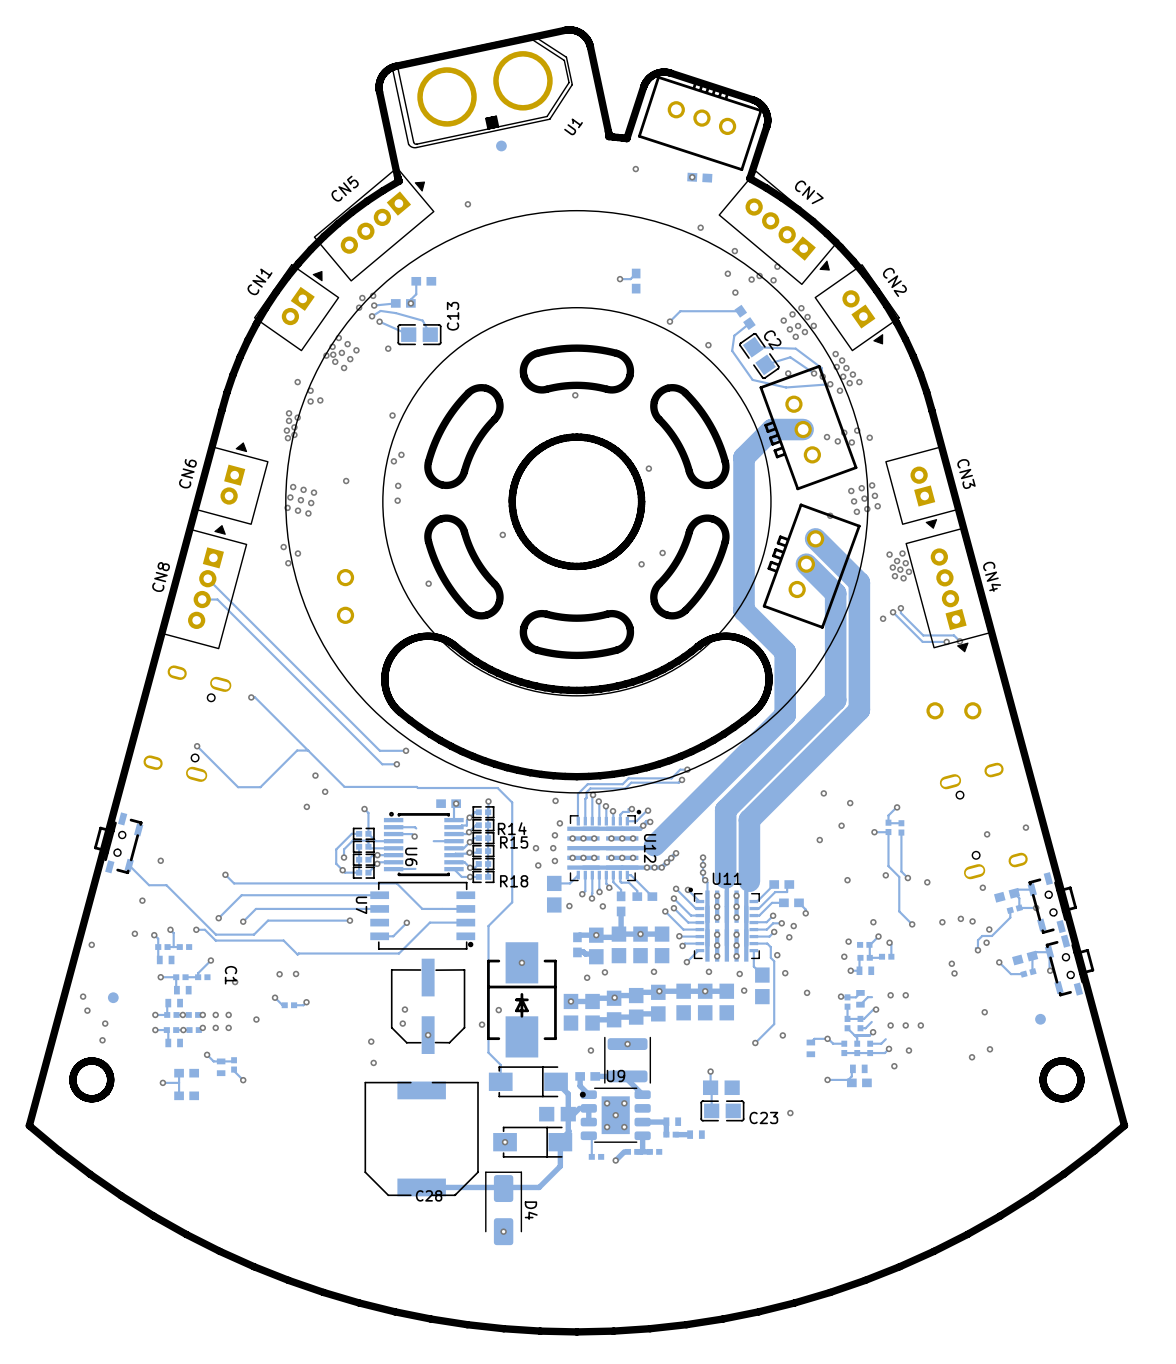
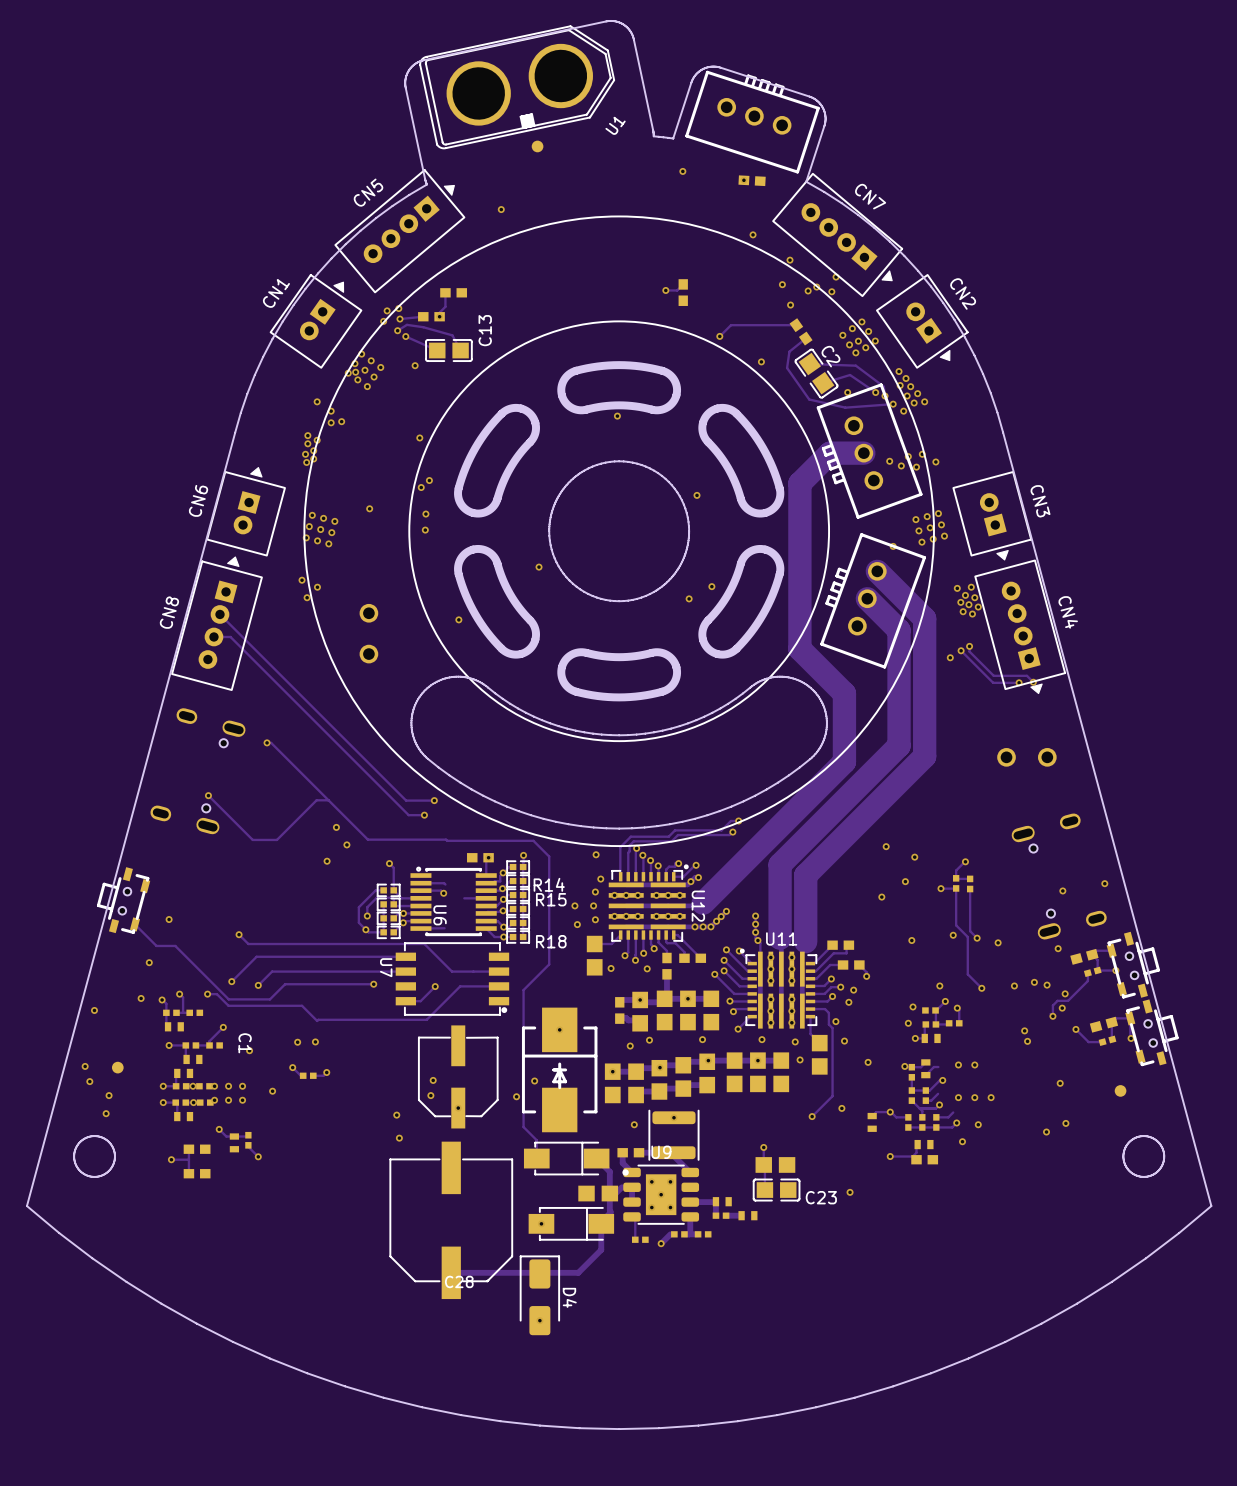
board edge width: thick (626, 138) (646, 81) (657, 73) (670, 73) (753, 100) (763, 107) (767, 115) (767, 123) (750, 178) -> thin (673, 138) (694, 76) (706, 67) (720, 67) (810, 96) (820, 104) (824, 113) (825, 122) (806, 181)
board edge width: thick (626, 138) (608, 136) (589, 44) (583, 35) (574, 30) (564, 30) (395, 66) (387, 70) (381, 76) (379, 90) (399, 181) (352, 212) (324, 236) (298, 263) (275, 292) (256, 323) (233, 374) (29, 1125) (89, 1174) (153, 1215) (219, 1251) (253, 1266) (323, 1292) (359, 1302) (430, 1319) (467, 1324) (540, 1331) (613, 1331) (650, 1328) (722, 1319) (758, 1311) (830, 1292) (865, 1280) (933, 1251) (967, 1234) (1032, 1195) (1064, 1174) (1124, 1125) (920, 374) (896, 322) (876, 290) (853, 260) (827, 233) (798, 209) (749, 178) -> thin (673, 138) (653, 136) (633, 37) (626, 26) (616, 21) (606, 21) (422, 60) (414, 64) (408, 71) (405, 86) (426, 184) (376, 217) (345, 244) (318, 273) (293, 304) (272, 338) (247, 393) (235, 432) (26, 1206) (92, 1258) (161, 1303) (233, 1341) (269, 1358) (345, 1386) (383, 1397) (461, 1415) (500, 1421) (579, 1428) (658, 1428) (698, 1425) (777, 1415) (816, 1407) (893, 1386) (931, 1373) (1005, 1341) (1041, 1323) (1111, 1281) (1145, 1258) (1211, 1206) (1003, 432) (990, 393) (964, 337) (943, 302) (918, 270) (889, 241) (858, 215) (806, 181)
board edge width: thick (576, 437) (601, 441) (622, 456) (636, 476) (641, 501) (636, 526) (622, 547) (601, 561) (576, 566) (552, 561) (531, 547) (517, 526) (512, 501) (517, 476) (531, 456) (552, 441) (576, 437) -> thin (619, 461) (645, 466) (668, 481) (683, 504) (689, 531) (683, 558) (668, 580) (645, 595) (619, 601) (592, 595) (569, 580) (554, 558) (549, 531) (554, 504) (569, 481) (592, 466) (619, 461)
board edge width: thick (727, 636) (739, 638) (750, 644) (758, 651) (765, 662) (768, 674) (768, 687) (764, 698) (758, 707) (723, 734) (691, 751) (658, 764) (612, 774) (576, 776) (541, 774) (506, 767) (473, 756) (430, 734) (400, 712) (390, 700) (385, 685) (386, 668) (393, 653) (406, 641) (422, 636) (434, 636) (446, 640) (483, 665) (513, 679) (544, 687) (576, 690) (609, 687) (640, 679) (670, 665) (707, 640) (727, 636) -> thin (782, 676) (795, 679) (807, 685) (816, 693) (823, 705) (826, 718) (826, 731) (821, 744) (815, 754) (777, 782) (743, 801) (707, 815) (657, 826) (619, 828) (581, 826) (543, 818) (506, 806) (460, 782) (428, 759) (417, 746) (411, 729) (412, 711) (420, 695) (434, 682) (451, 677) (465, 677) (478, 681) (517, 708) (550, 723) (584, 732) (619, 735) (654, 732) (688, 723) (720, 708) (760, 681) (782, 676)
part footprint: [93, 812, 144, 875] -> [96, 867, 151, 934]
part footprint: [1027, 872, 1077, 934] -> [1106, 931, 1161, 999]
part footprint: [1044, 934, 1095, 997] -> [1125, 999, 1179, 1067]
board edge width: thick (92, 1061) (105, 1067) (110, 1080) (104, 1093) (91, 1098) (77, 1092) (72, 1079) (79, 1065) (92, 1061) -> thin (95, 1136) (103, 1137) (109, 1142) (113, 1149) (114, 1157) (113, 1165) (108, 1171) (101, 1175) (93, 1176) (85, 1174) (79, 1170) (75, 1163) (74, 1155) (76, 1147) (80, 1141) (87, 1137) (95, 1136)
board edge width: thick (1062, 1061) (1075, 1066) (1080, 1080) (1075, 1093) (1061, 1098) (1048, 1092) (1043, 1079) (1048, 1066) (1062, 1061) -> thin (1144, 1136) (1152, 1137) (1158, 1142) (1162, 1149) (1164, 1156) (1162, 1164) (1157, 1171) (1151, 1175) (1143, 1176) (1135, 1175) (1129, 1170) (1124, 1163) (1123, 1156) (1125, 1148) (1129, 1141) (1136, 1137) (1144, 1136)
C28 footprint: [364, 1081, 479, 1197] -> [389, 1141, 514, 1300]

